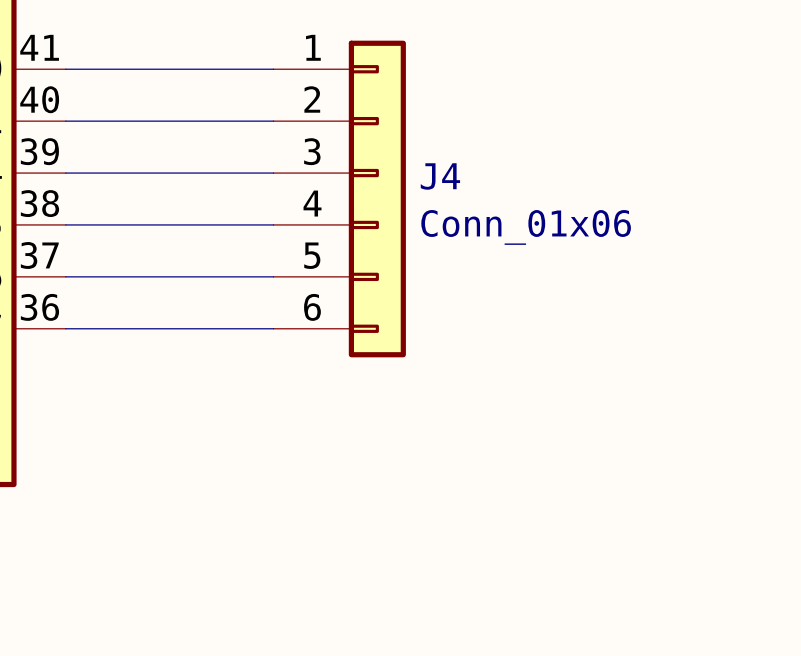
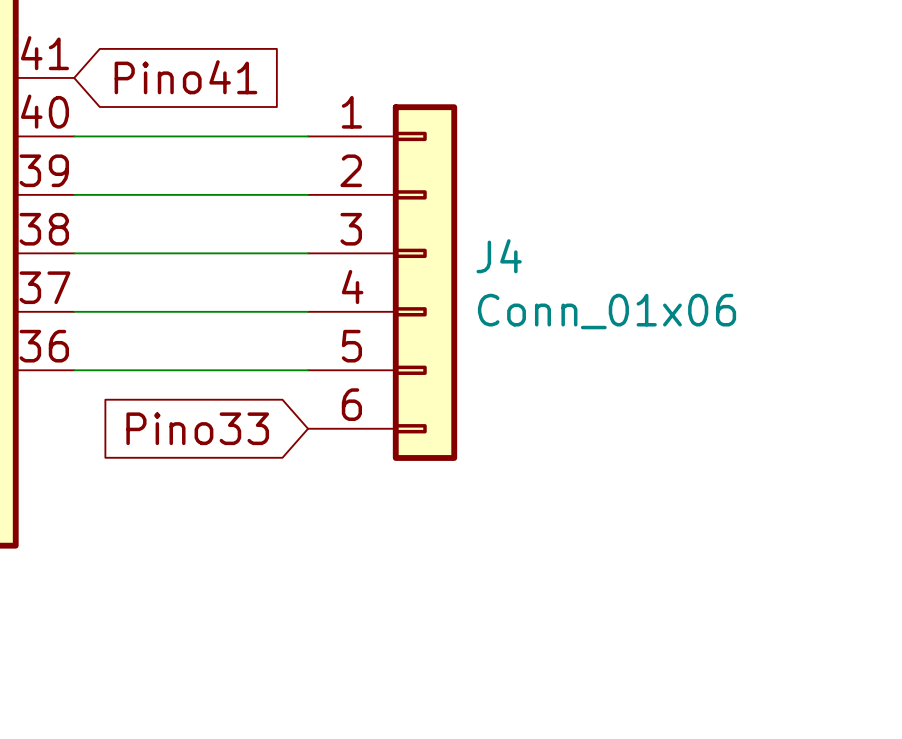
global label: none -> Pino41 (185, 77)
wire: (65, 69) (273, 69) -> none
J4 position: (339, 199) -> (382, 282)
global label: none -> Pino33 (197, 428)

